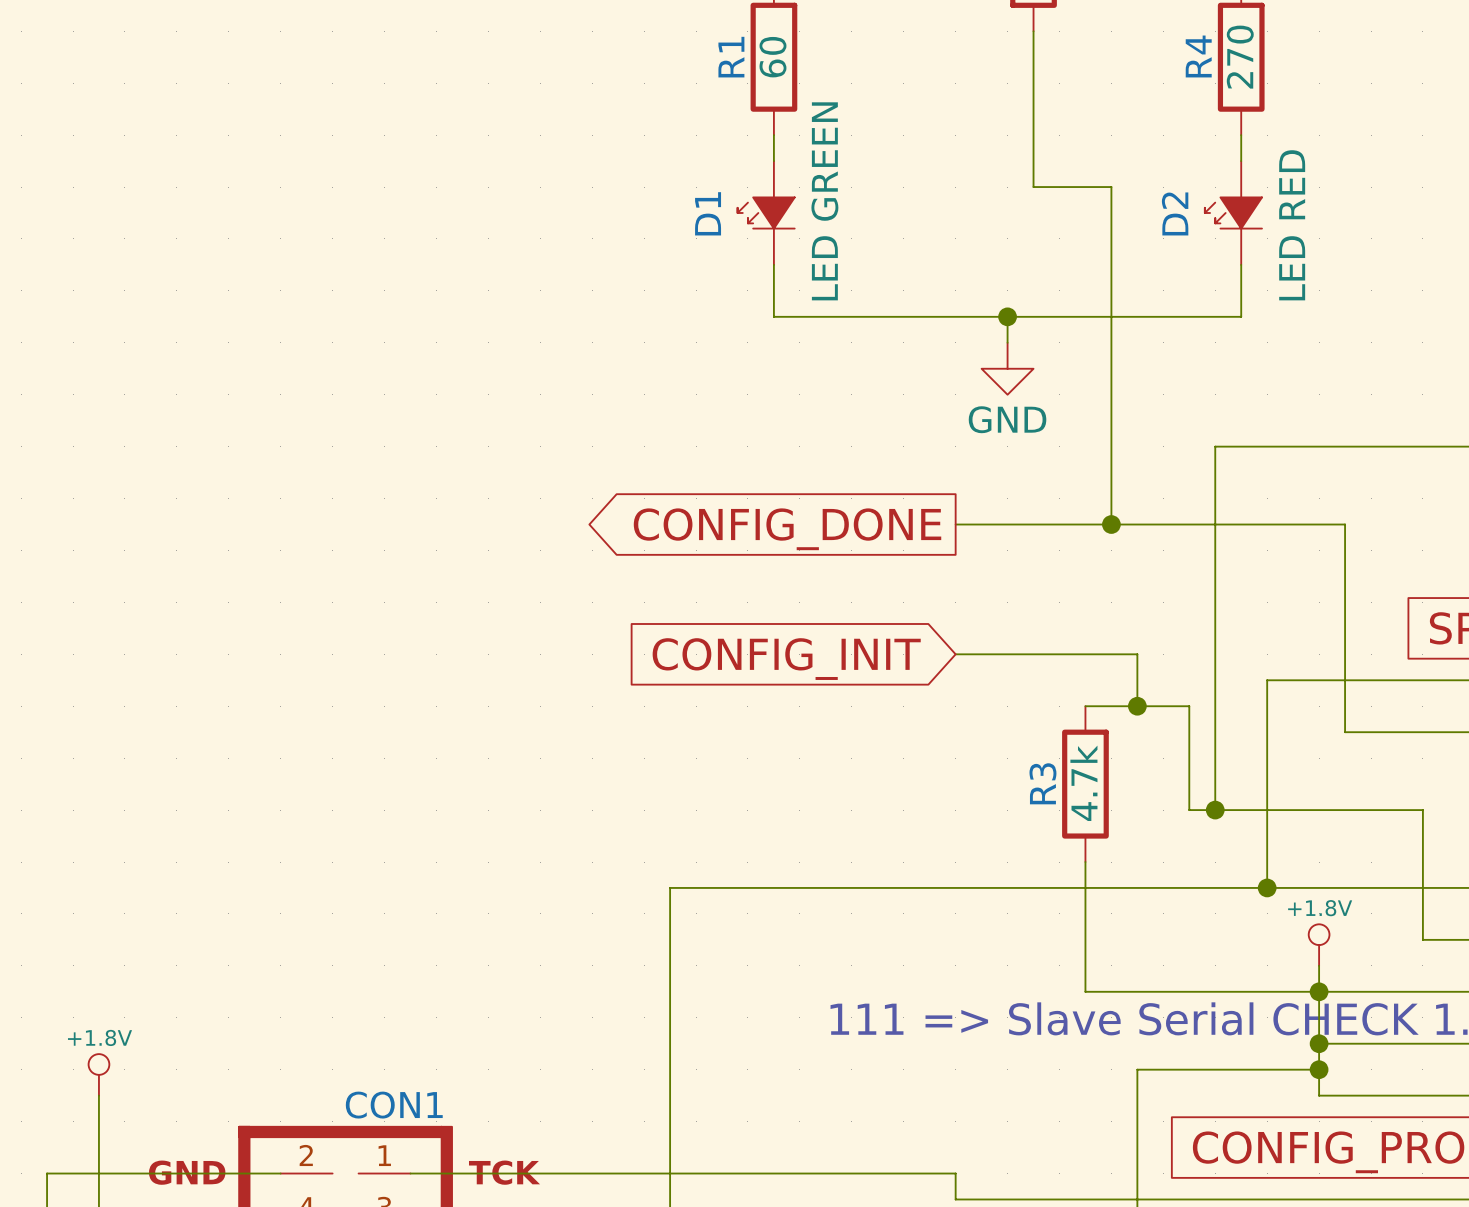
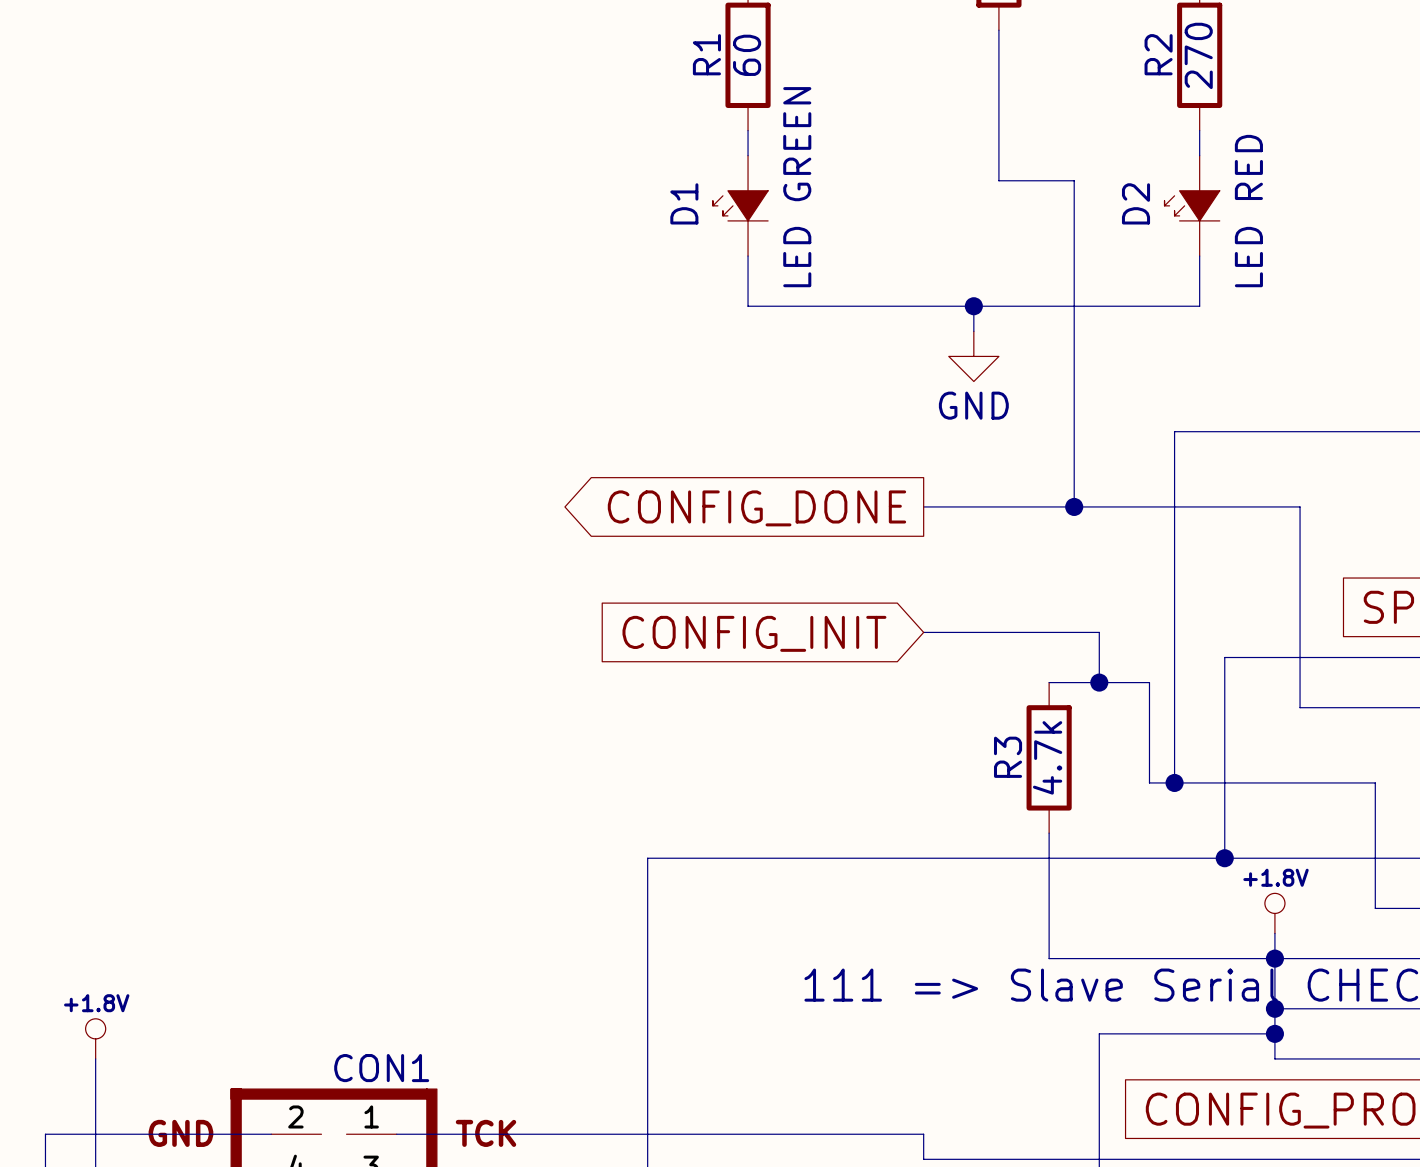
R4 name: R4 (1198, 56) -> R2 (1158, 54)

